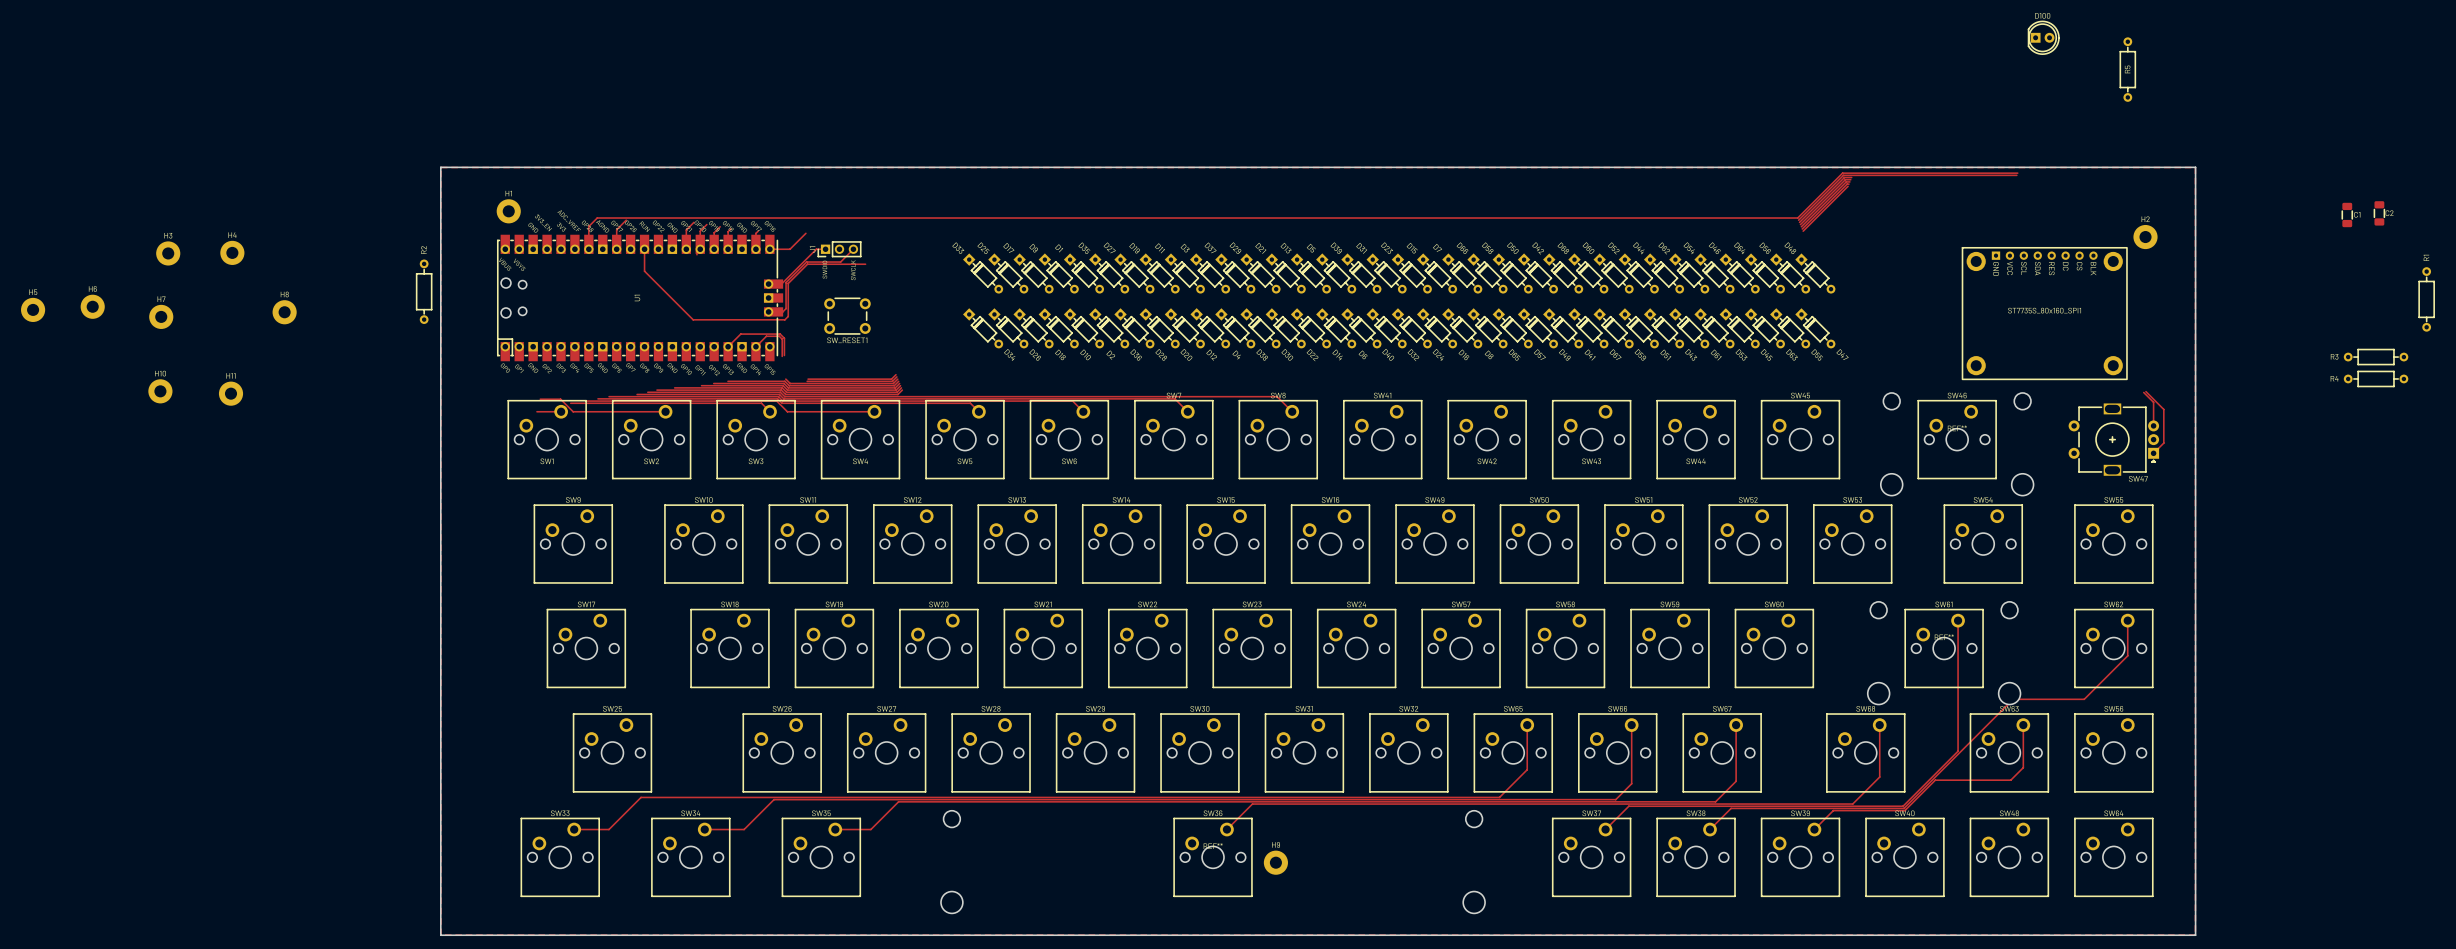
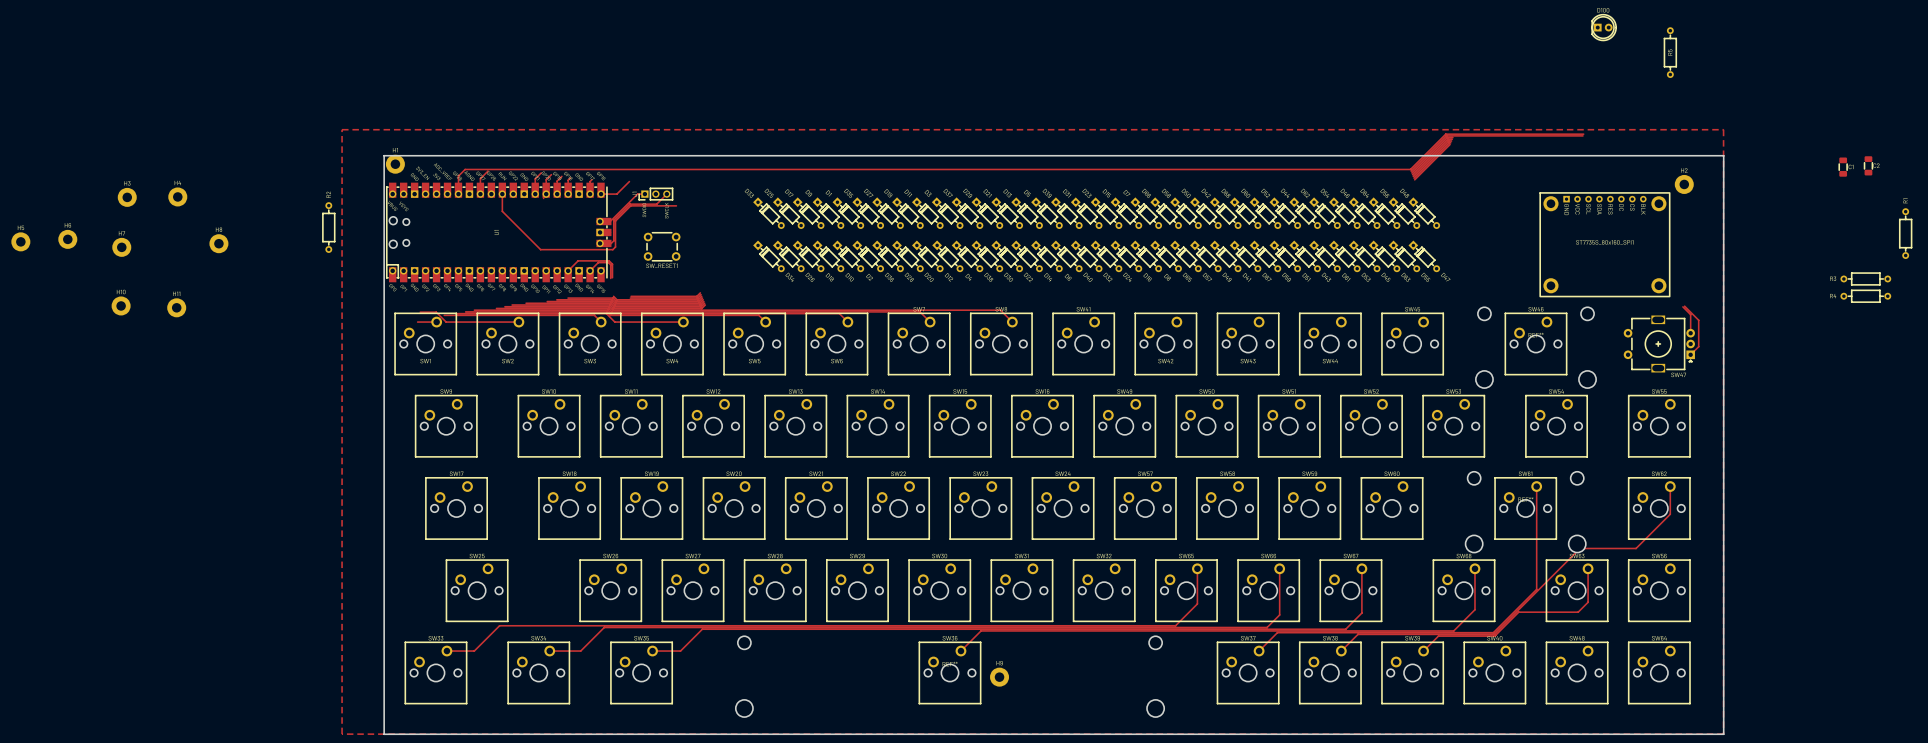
board edge: (2195, 200) (2195, 167) (440, 167) (440, 935) (494, 935) -> (1723, 155) (384, 155) (384, 734)

